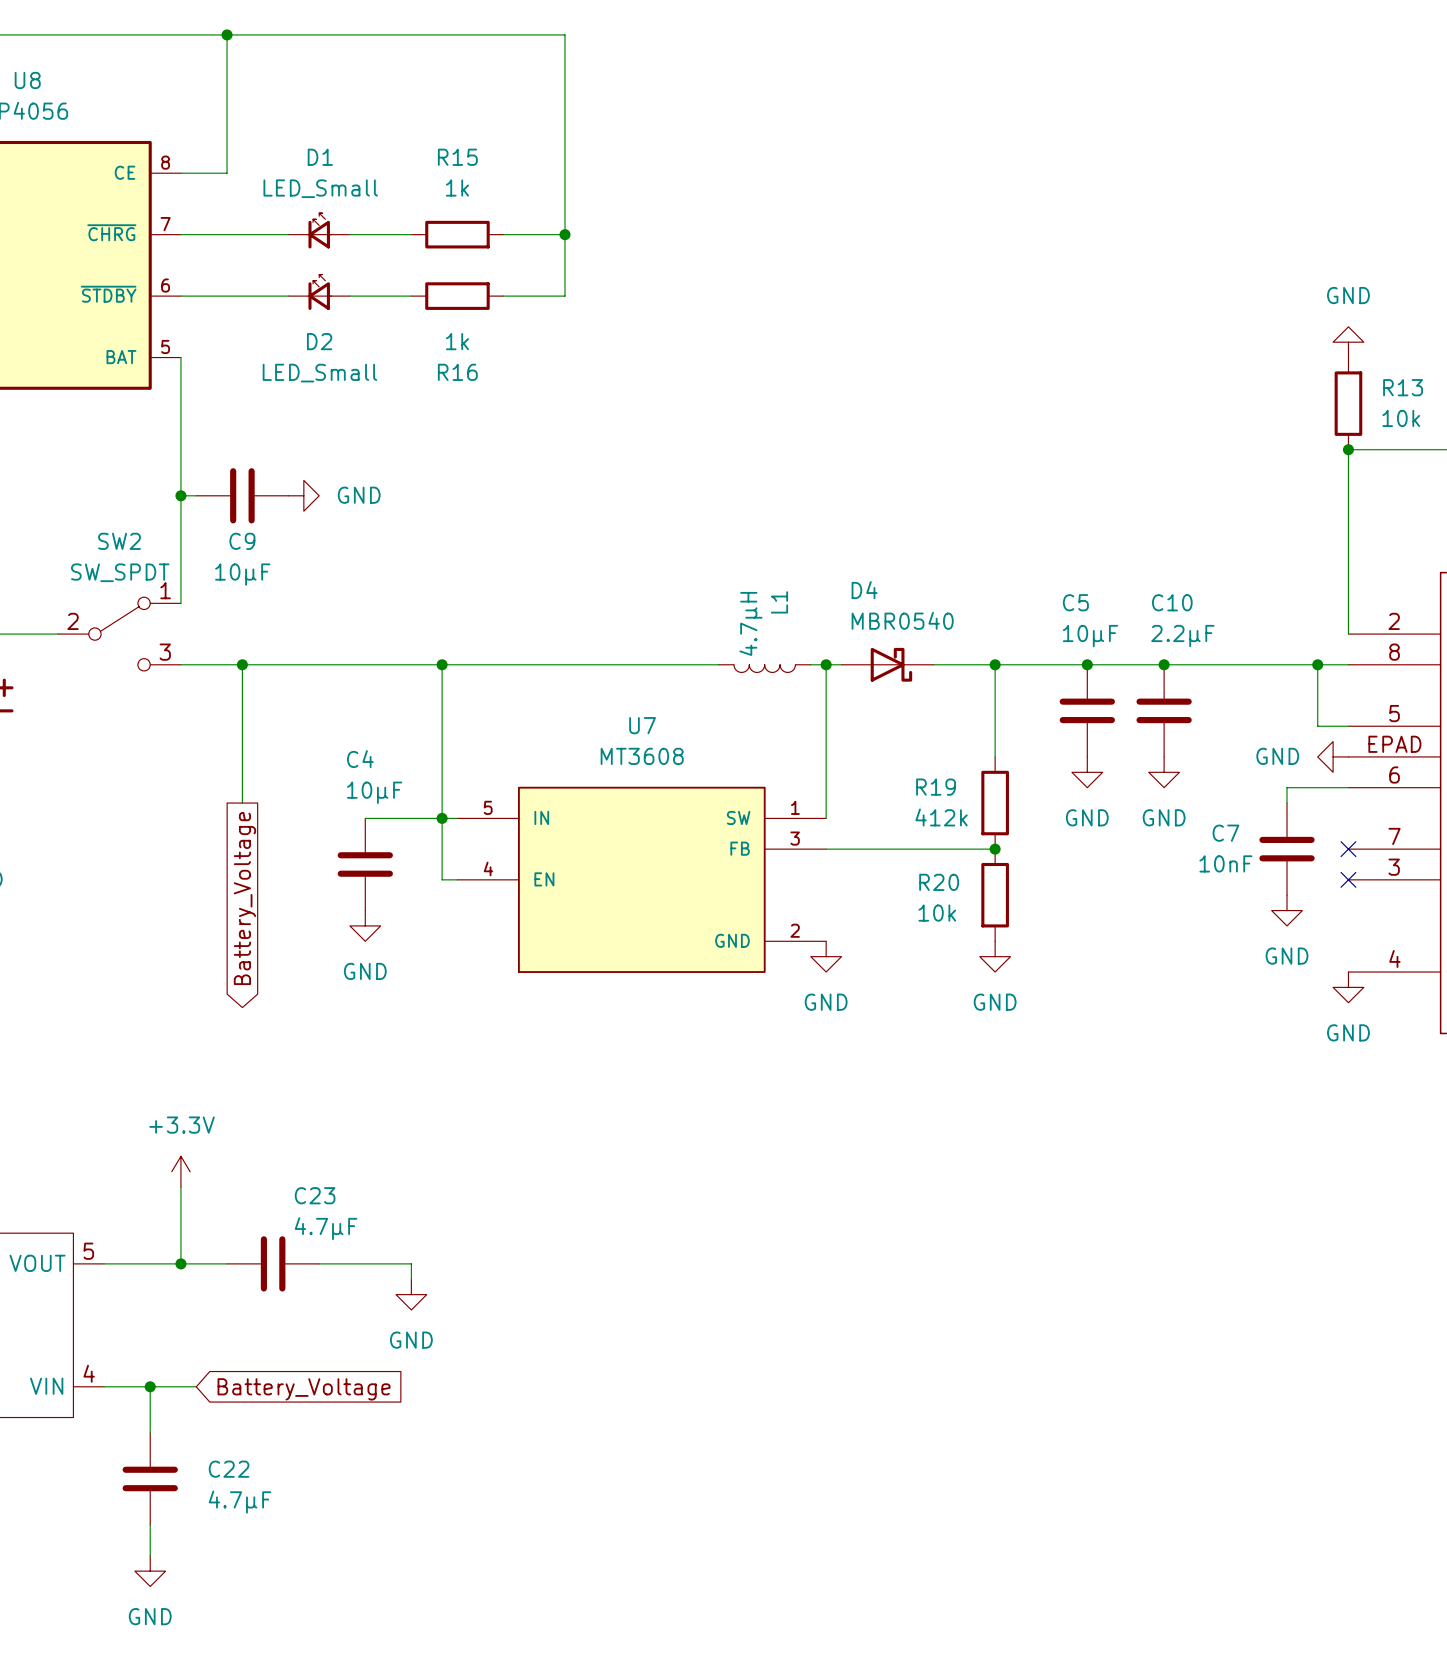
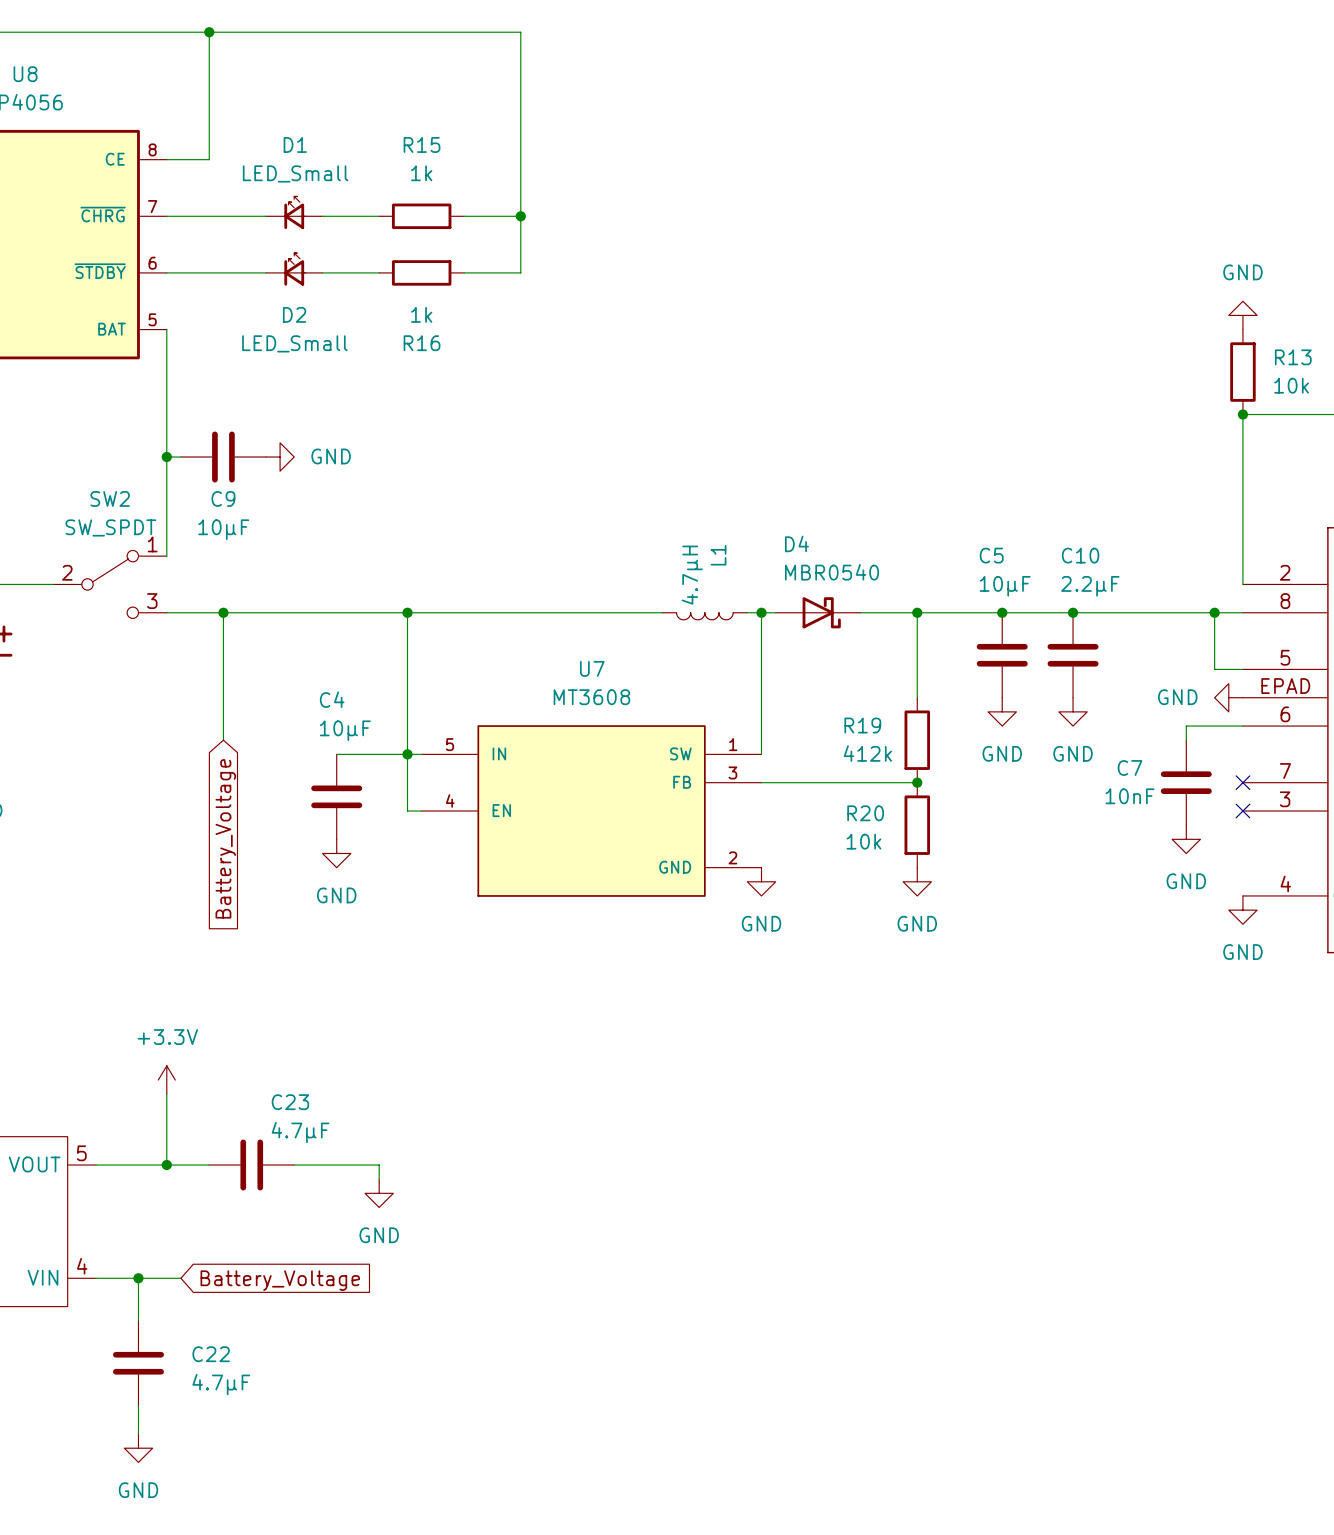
global label shape: output (244, 898) -> input (225, 838)

